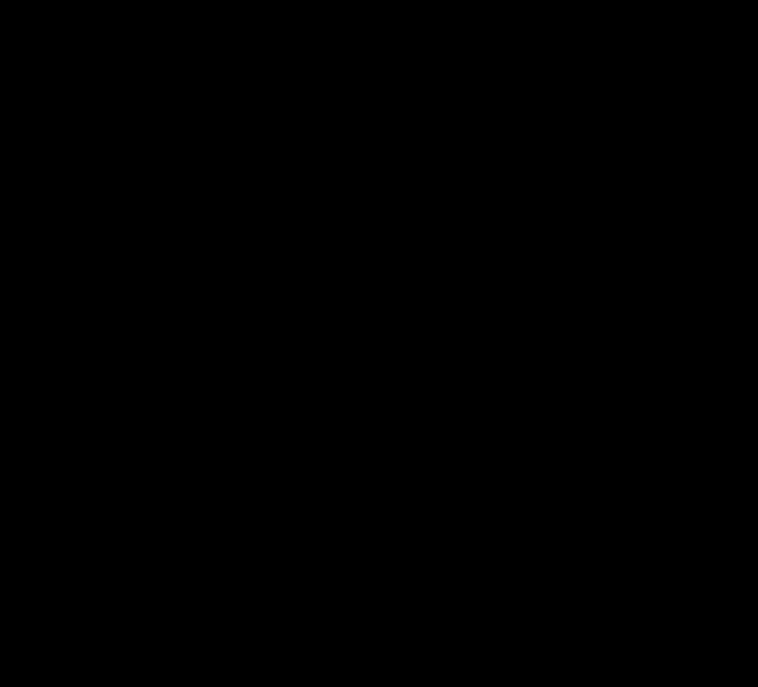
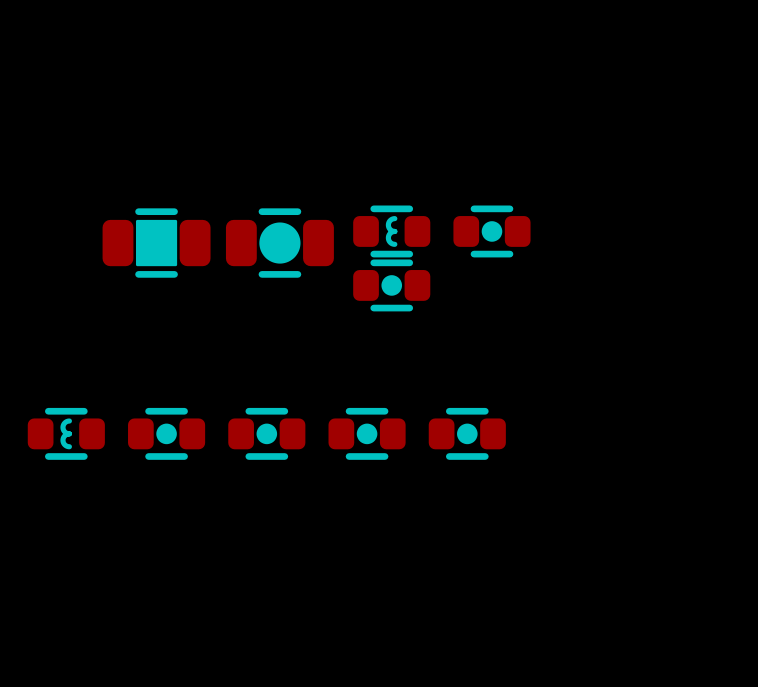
part: none -> (391, 231)
part: none -> (491, 231)
part: none -> (156, 243)
part: none -> (279, 243)
part: none -> (391, 285)
part: none -> (66, 433)
part: none -> (166, 433)
part: none -> (266, 433)
part: none -> (367, 433)
part: none -> (467, 433)

